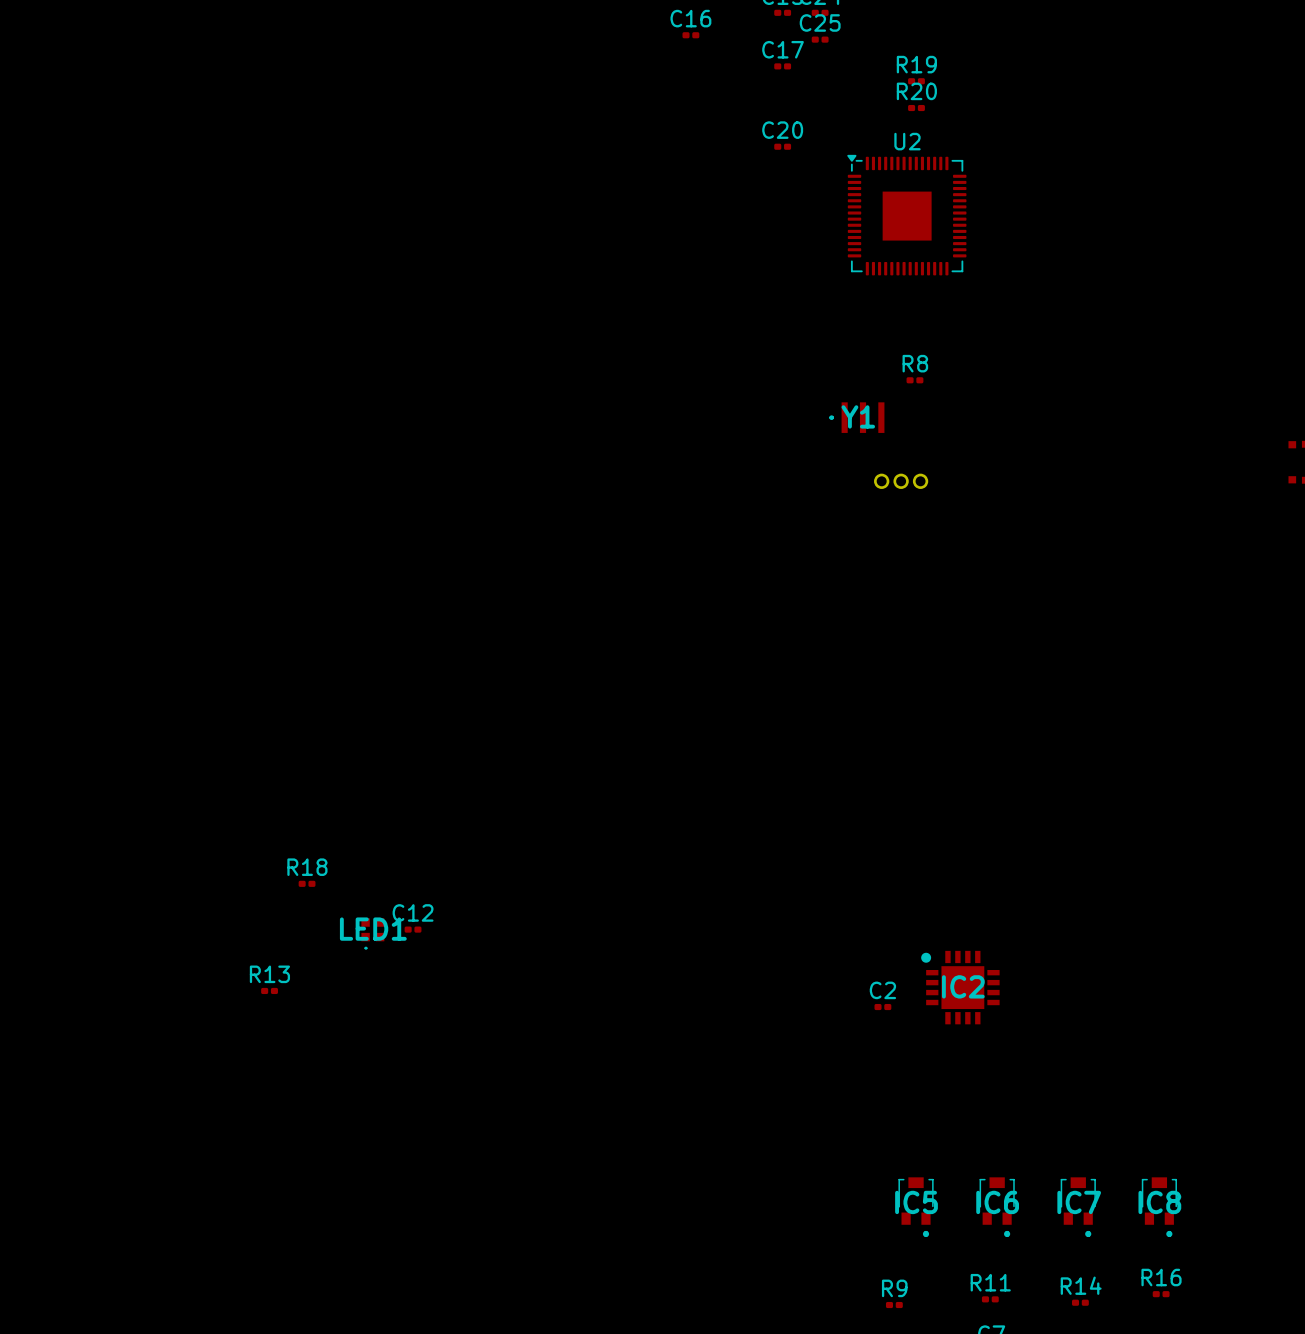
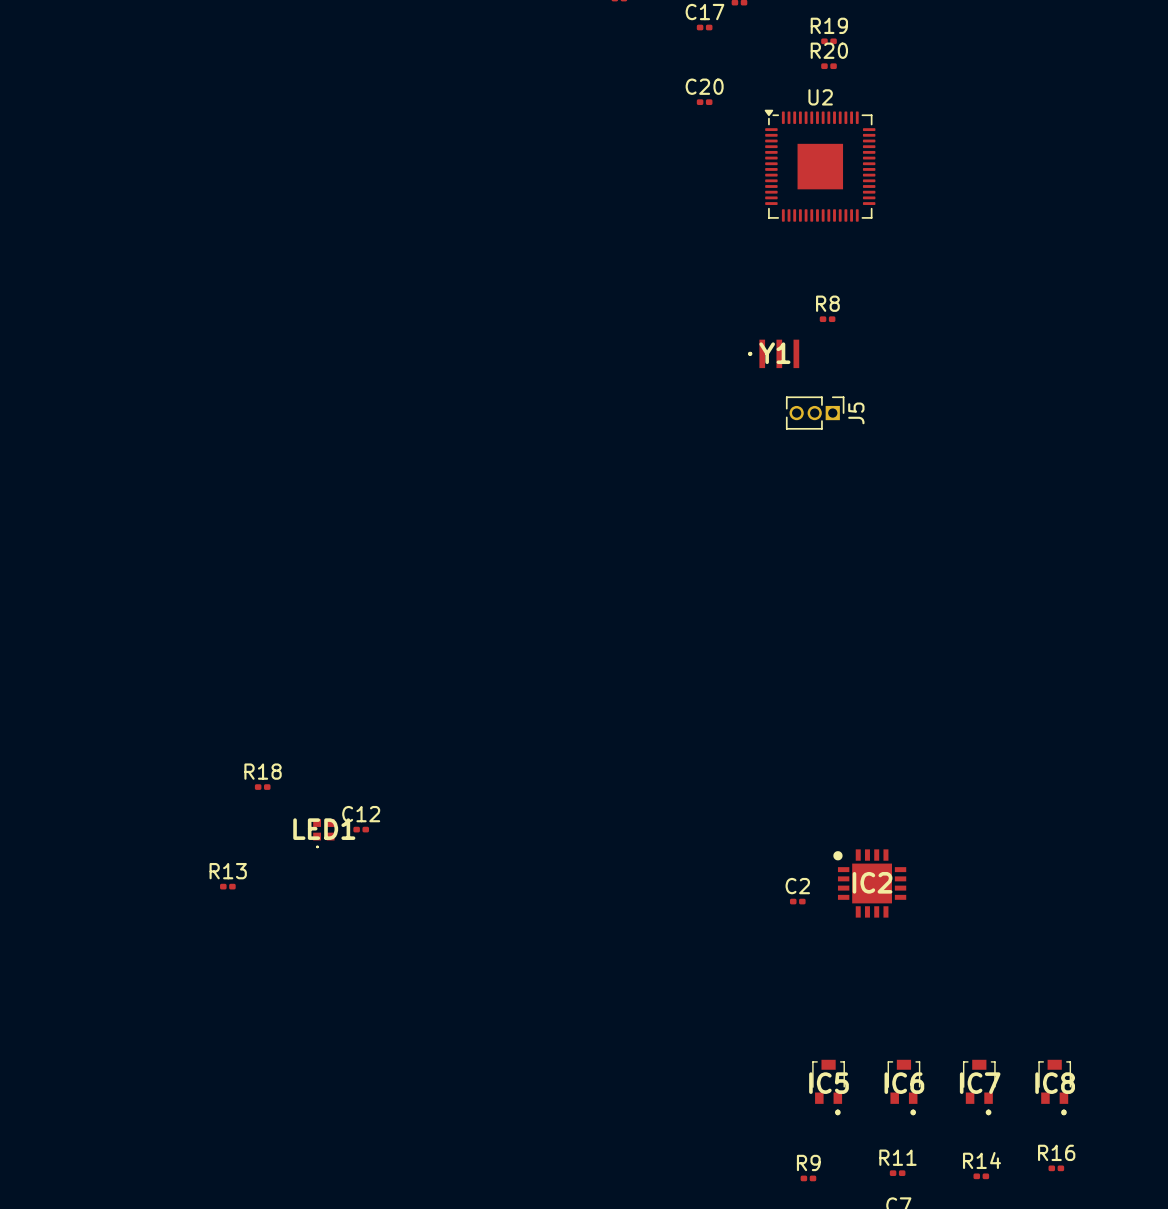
part: (901, 481) -> none
J5: none -> (815, 413)

